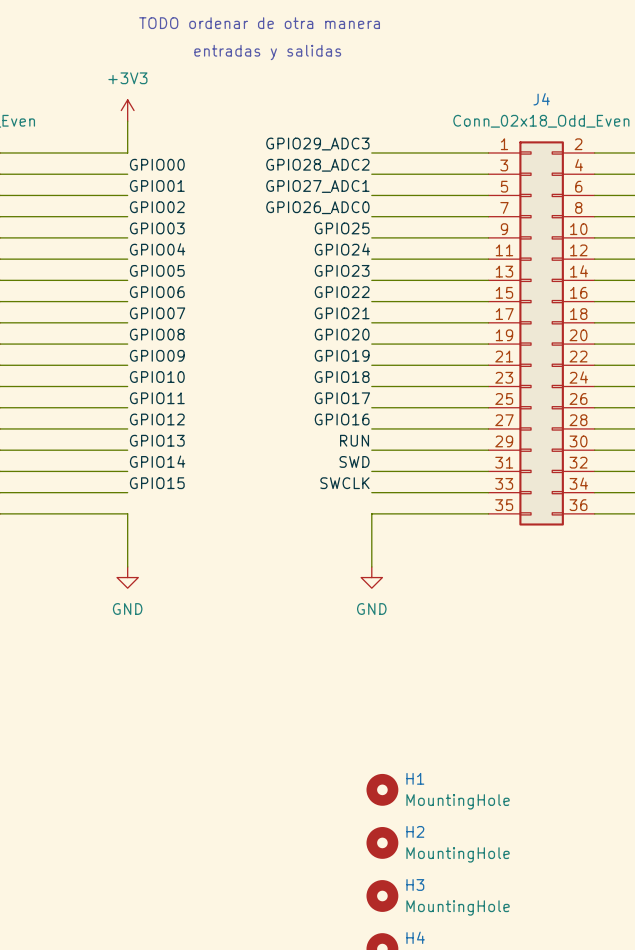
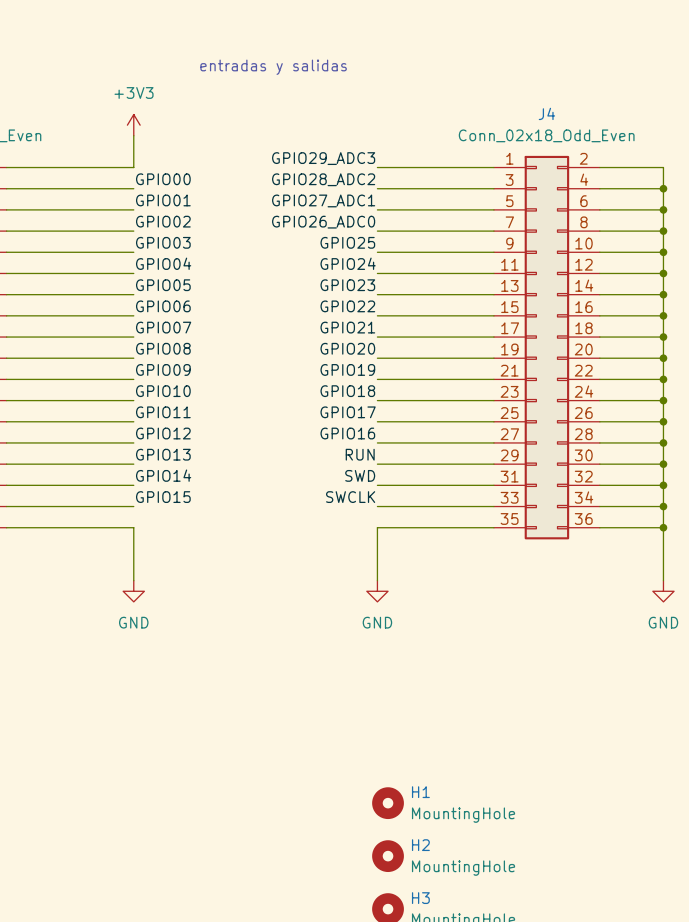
text: TODO ordenar de otra manera (259, 23) -> none

